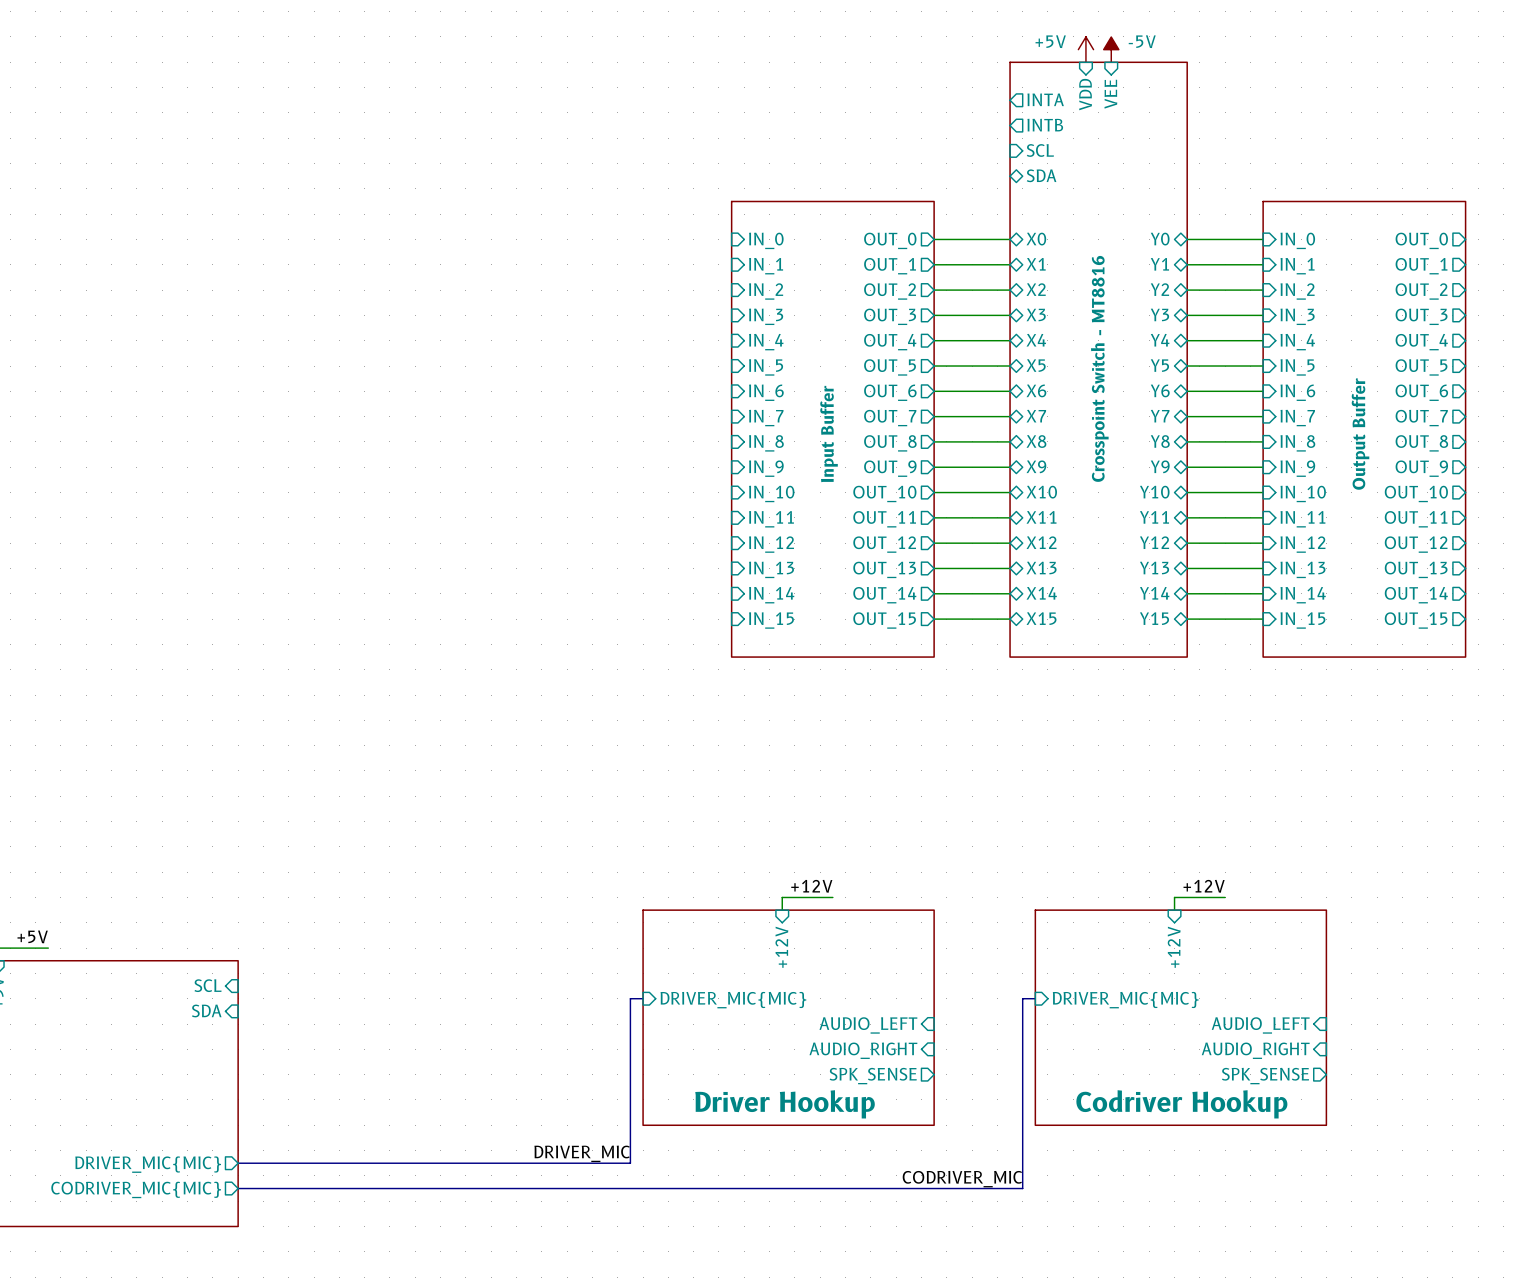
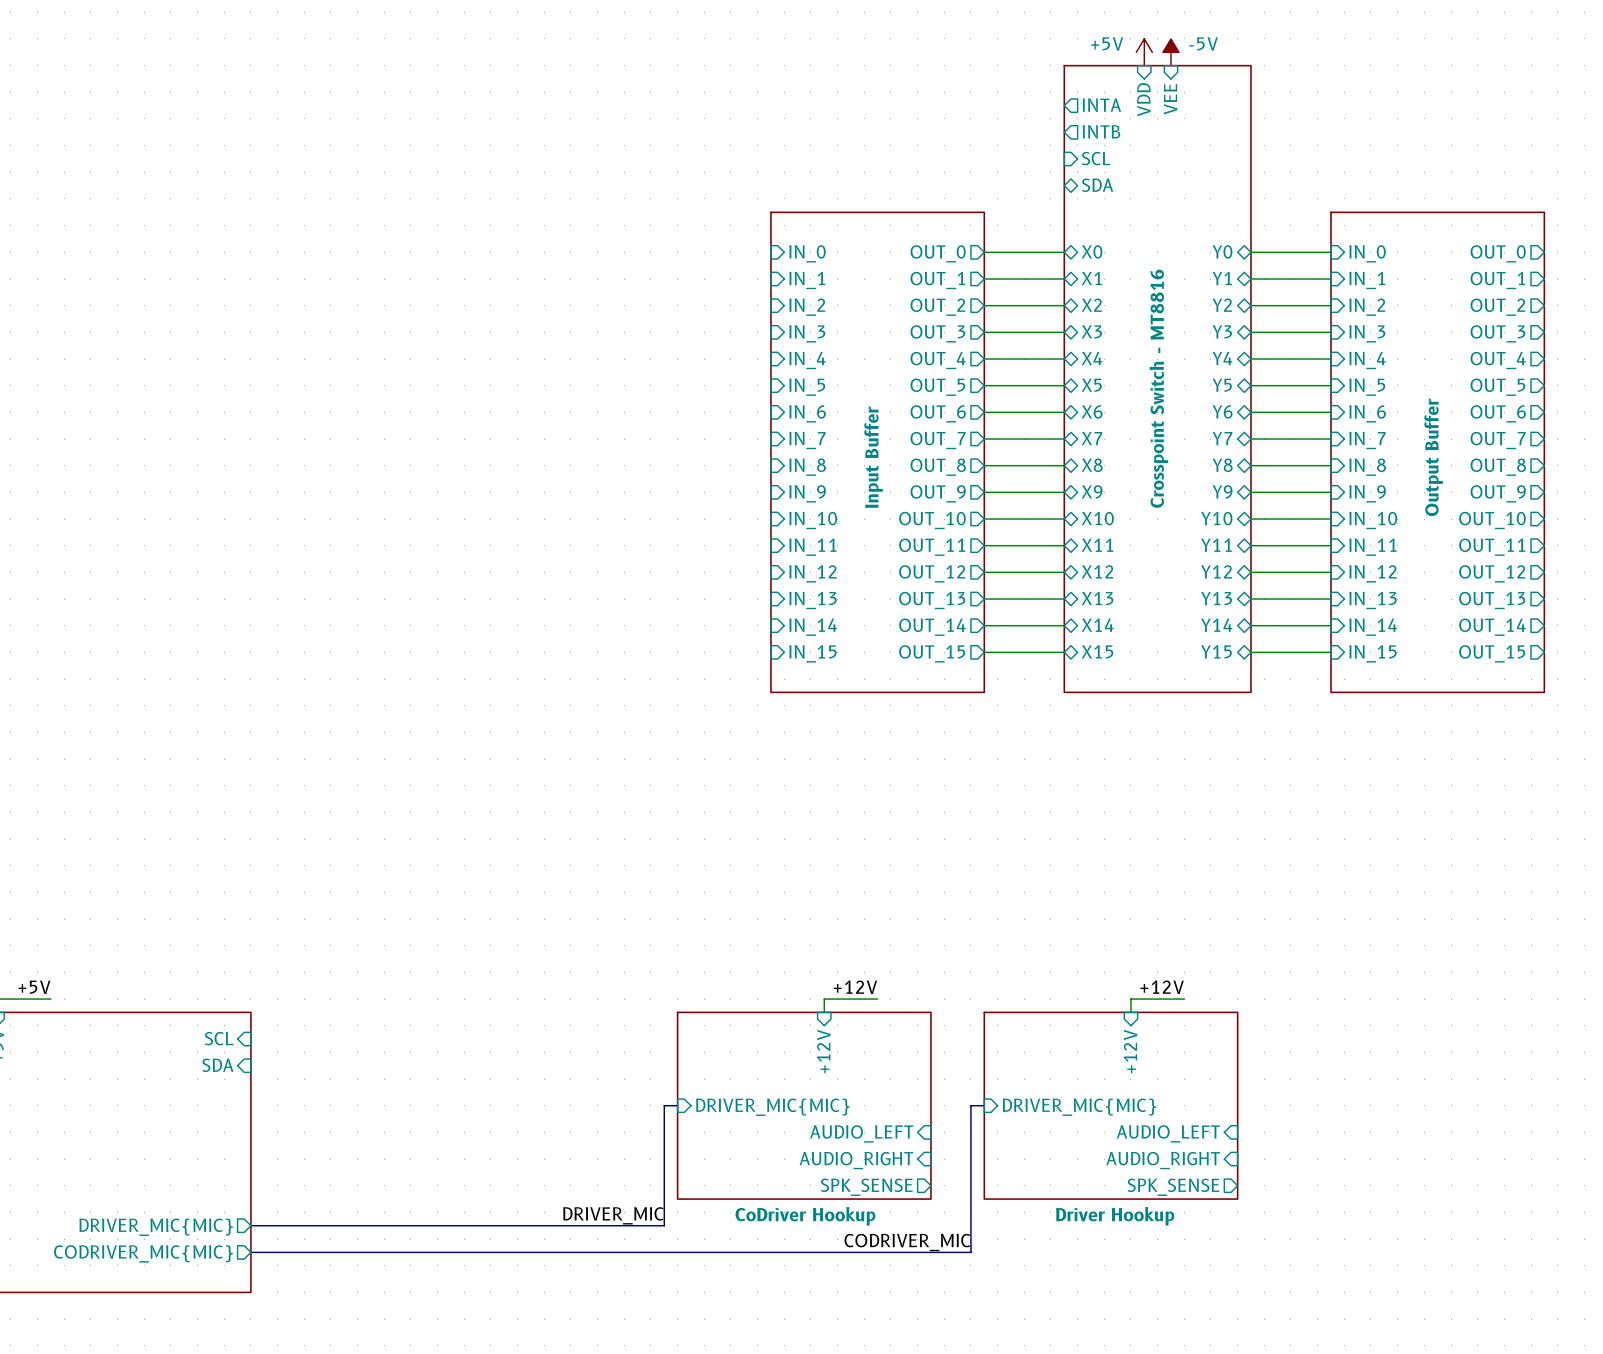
label position: +12V (811, 886) -> +12V (855, 987)
label position: +12V (1204, 886) -> +12V (1162, 987)
wire: (832, 897) (782, 897) (782, 910) -> (877, 999) (824, 999) (824, 1012)
wire: (1225, 897) (1174, 897) (1174, 910) -> (1184, 999) (1130, 999) (1130, 1012)
sheet pin position: +12V (781, 947) -> +12V (823, 1051)
sheet pin position: +12V (1174, 947) -> +12V (1130, 1051)
bus: (643, 998) (630, 998) (630, 1049) -> (677, 1105) (664, 1105)
bus: (1035, 998) (1022, 998) (1022, 1188) (921, 1188) -> (984, 1105) (970, 1105) (970, 1252)
sheet pin position: DRIVER_MIC{MIC} (733, 1000) -> DRIVER_MIC{MIC} (772, 1107)
sheet pin position: DRIVER_MIC{MIC} (1125, 1000) -> DRIVER_MIC{MIC} (1079, 1107)
sheet Driver Hookup: (788, 1017) -> none
sheet Codriver Hookup: (1180, 1017) -> none
sheet pin position: AUDIO_LEFT (868, 1025) -> AUDIO_LEFT (861, 1133)
sheet pin: AUDIO_LEFT (1260, 1025) -> none
sheet CoDriver Hookup: none -> (804, 1105)
sheet Driver Hookup: none -> (1110, 1105)
sheet pin position: AUDIO_RIGHT (863, 1050) -> AUDIO_RIGHT (856, 1160)
sheet pin: AUDIO_RIGHT (1255, 1050) -> none
sheet pin position: SPK_SENSE (873, 1076) -> SPK_SENSE (866, 1187)
sheet pin: none -> AUDIO_LEFT (1168, 1133)
sheet pin: SPK_SENSE (1265, 1076) -> none
sheet pin: none -> AUDIO_RIGHT (1163, 1160)
sheet pin: none -> SPK_SENSE (1173, 1187)
label position: CODRIVER_MIC (962, 1179) -> CODRIVER_MIC (907, 1242)

